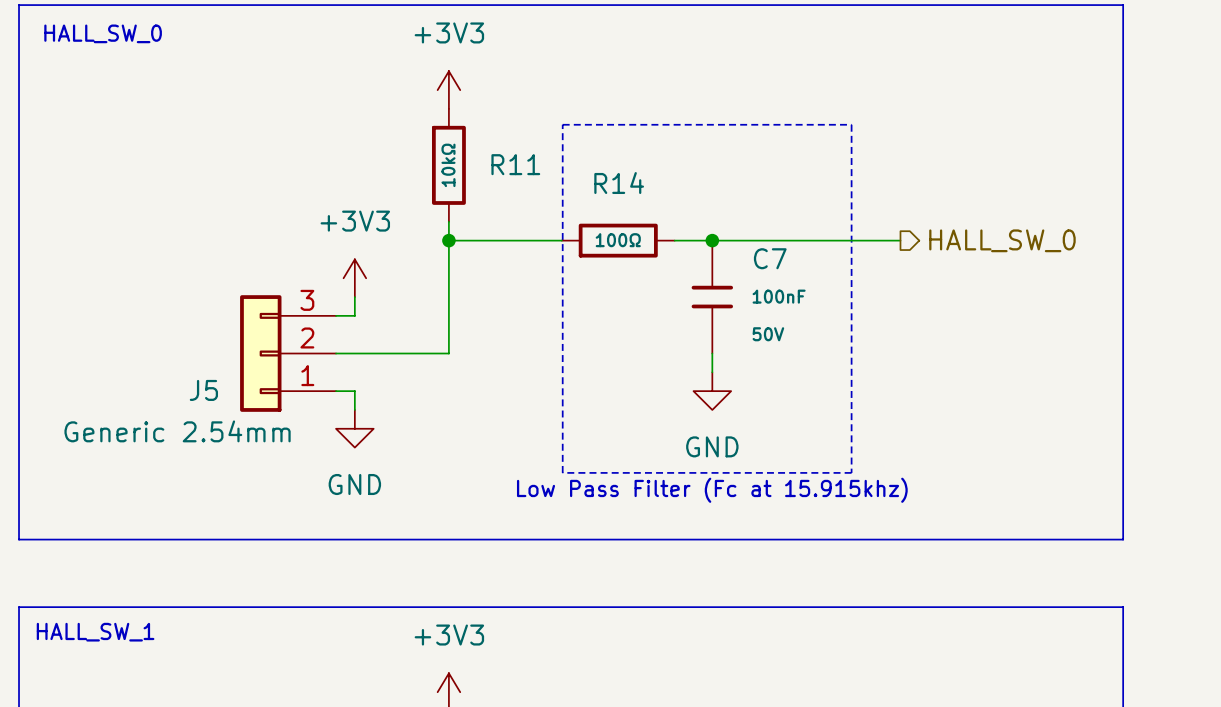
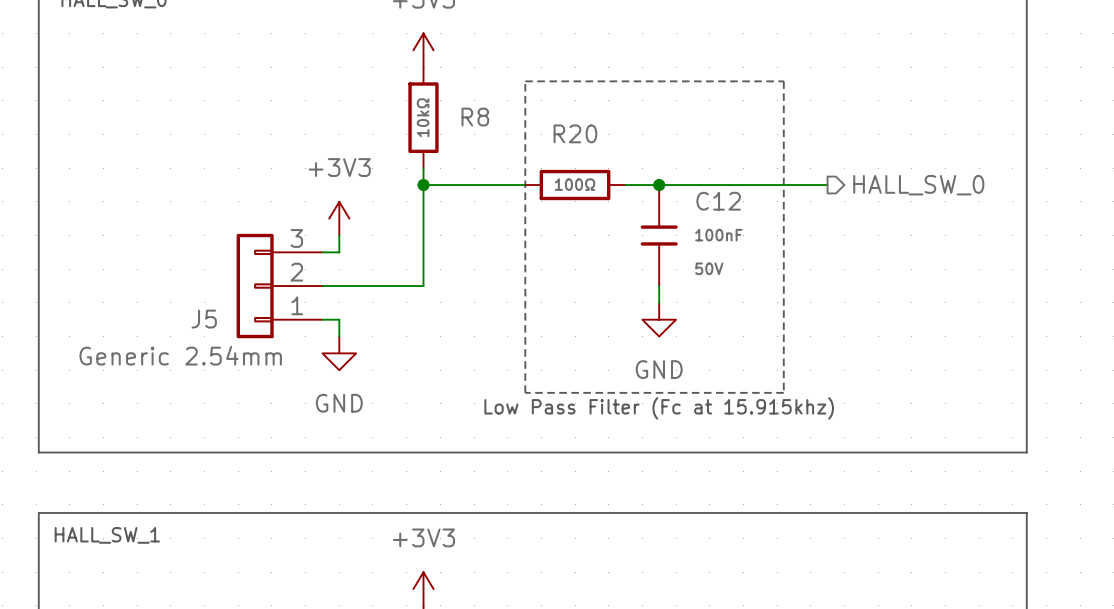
R11 name: R11 (515, 164) -> R8 (475, 117)
R14 name: R14 (619, 183) -> R20 (575, 133)
C7 name: C7 (770, 258) -> C12 (718, 201)

